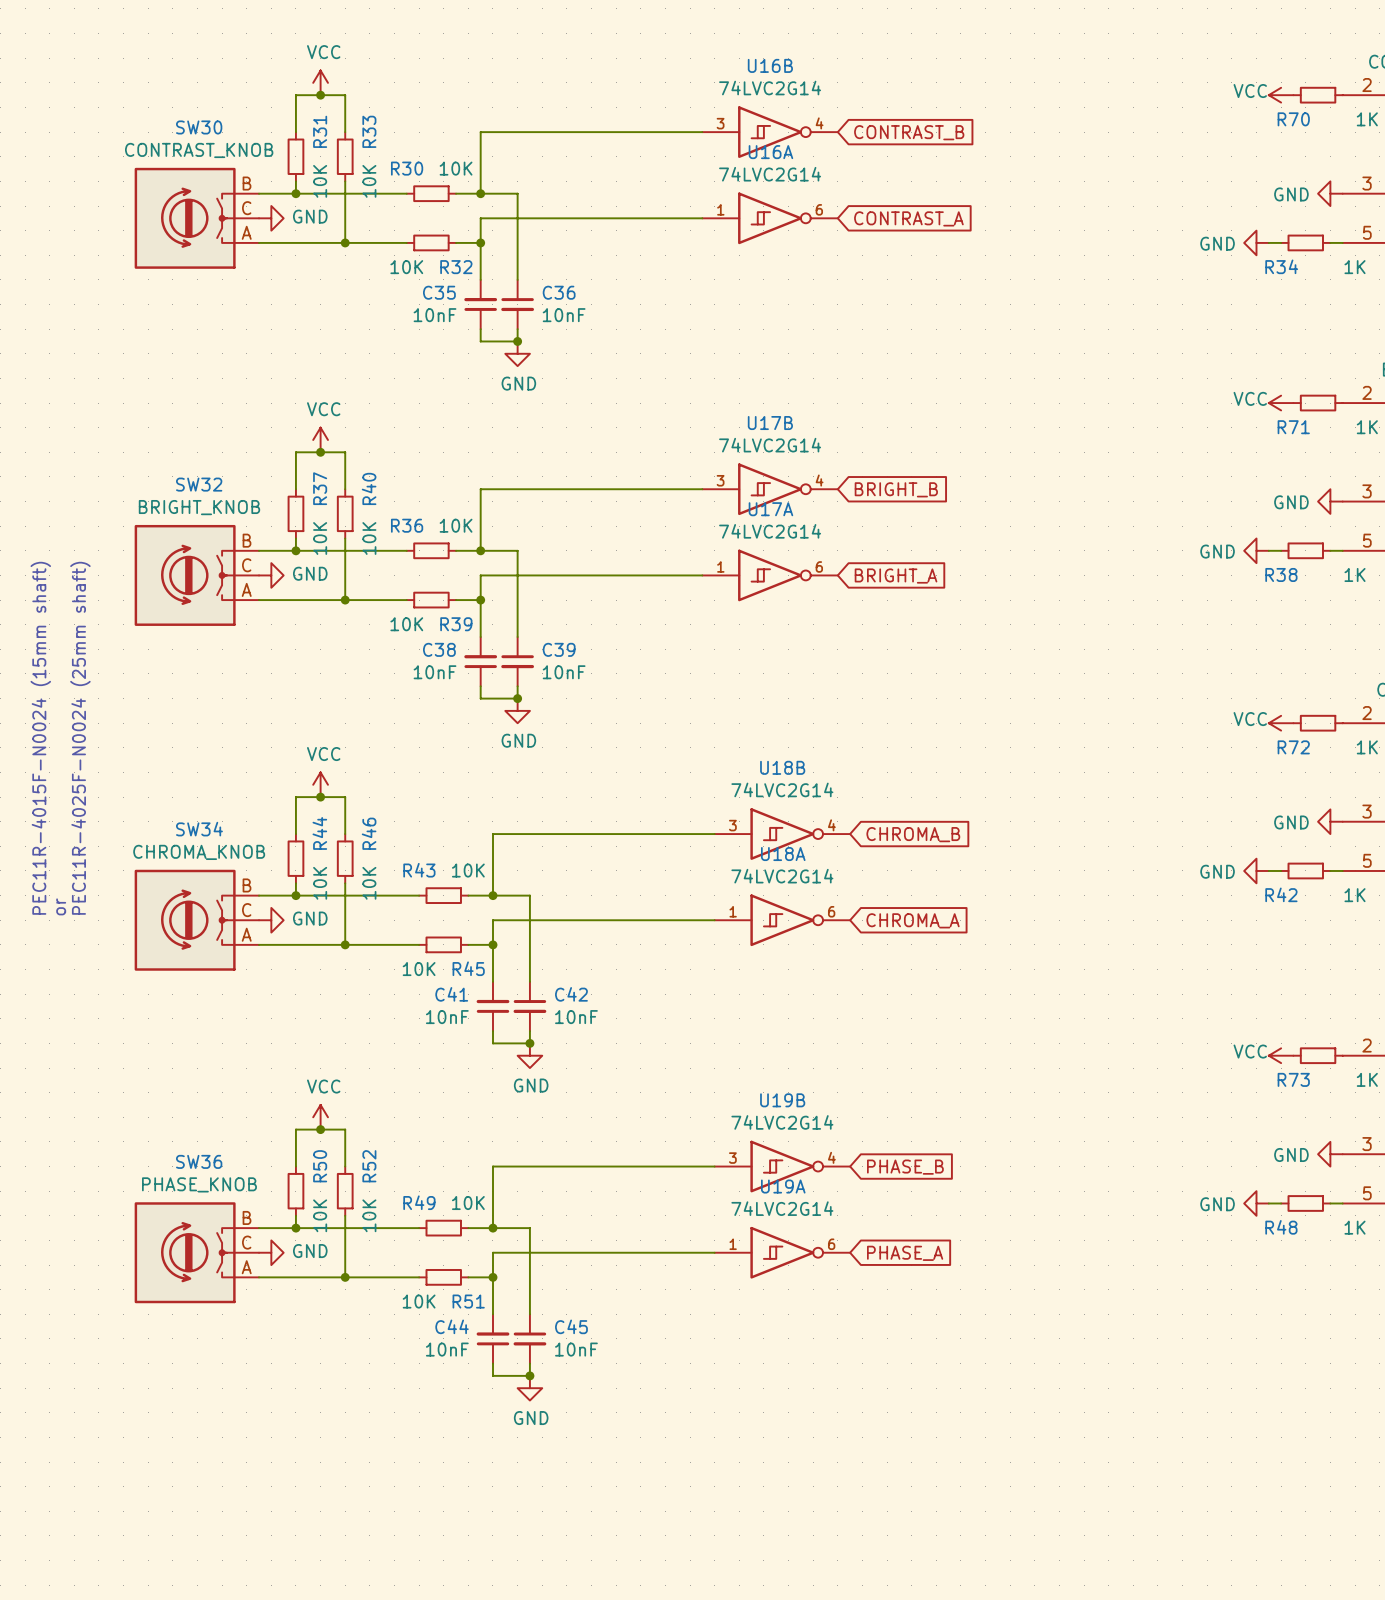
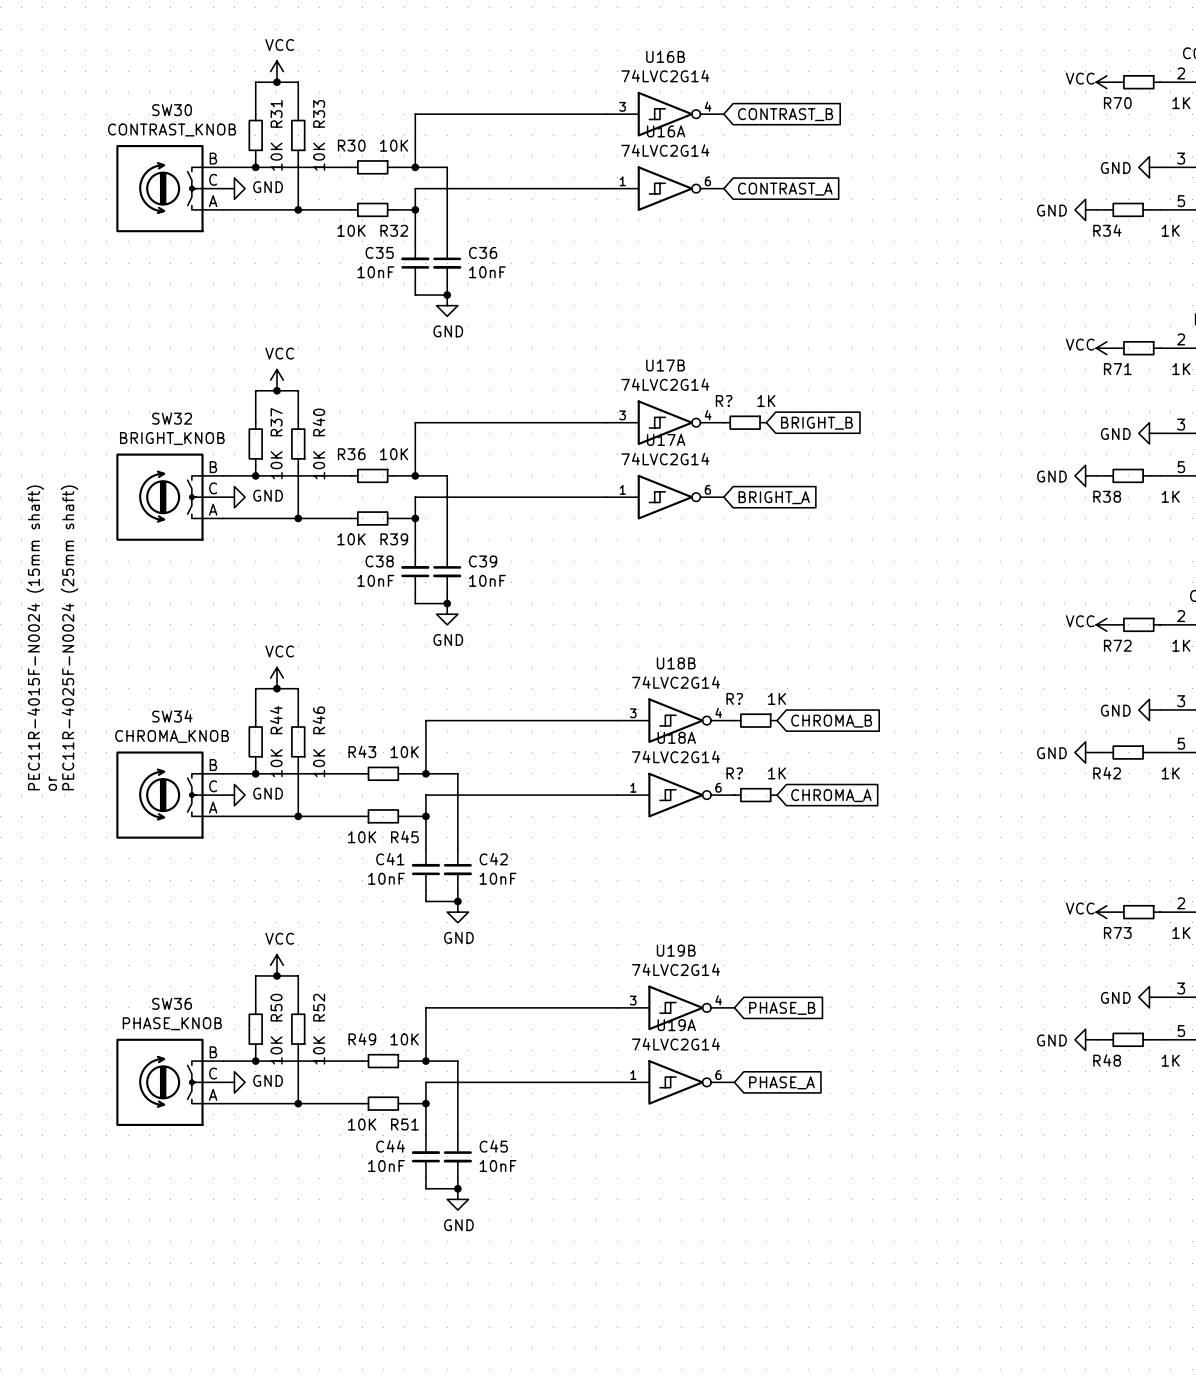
R?: none -> 1K (745, 422)
global label position: BRIGHT_B (896, 489) -> BRIGHT_B (816, 423)
R?: none -> 1K (755, 720)
global label position: CHROMA_B (913, 834) -> CHROMA_B (831, 721)
R?: none -> 1K (755, 795)
global label position: CHROMA_A (913, 920) -> CHROMA_A (831, 795)

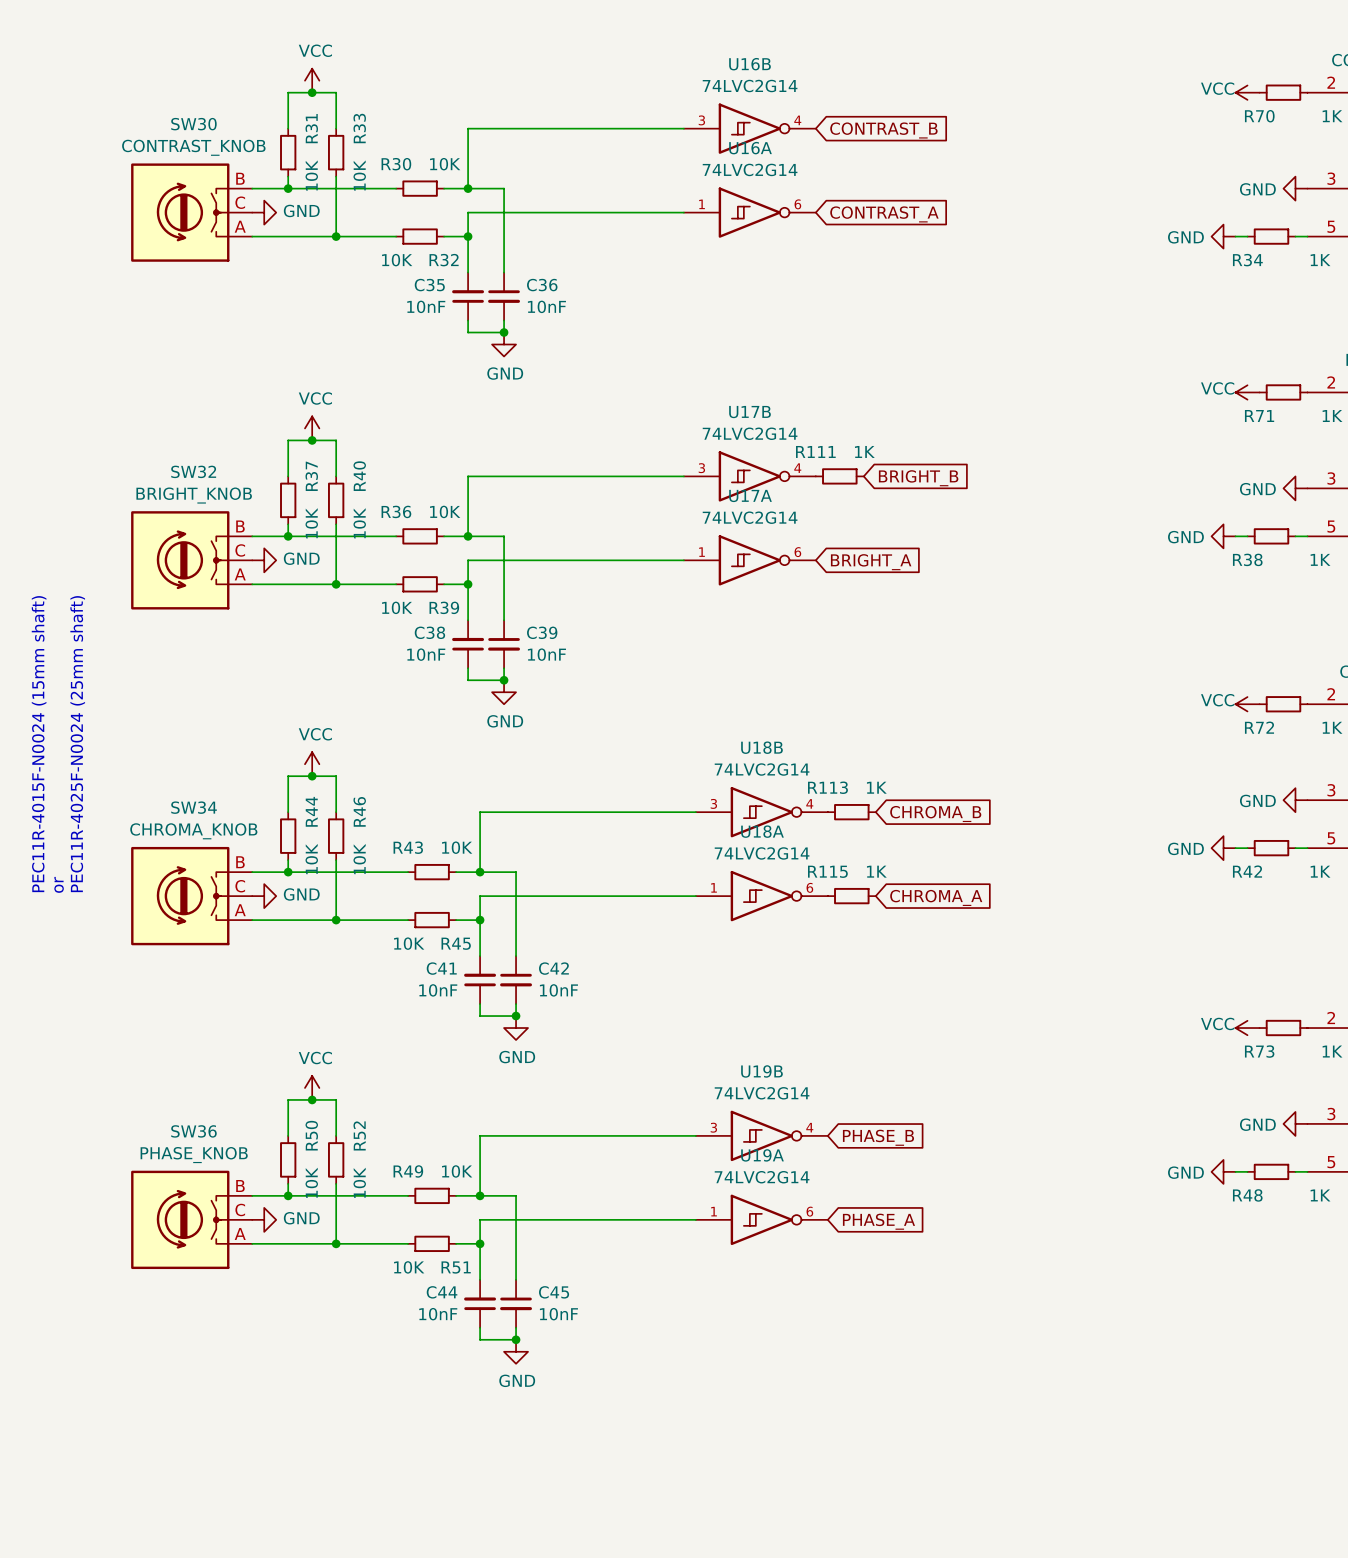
R? name: R? (724, 401) -> R111 (815, 451)
R? name: R? (734, 698) -> R113 (827, 787)
R? name: R? (734, 773) -> R115 (827, 871)

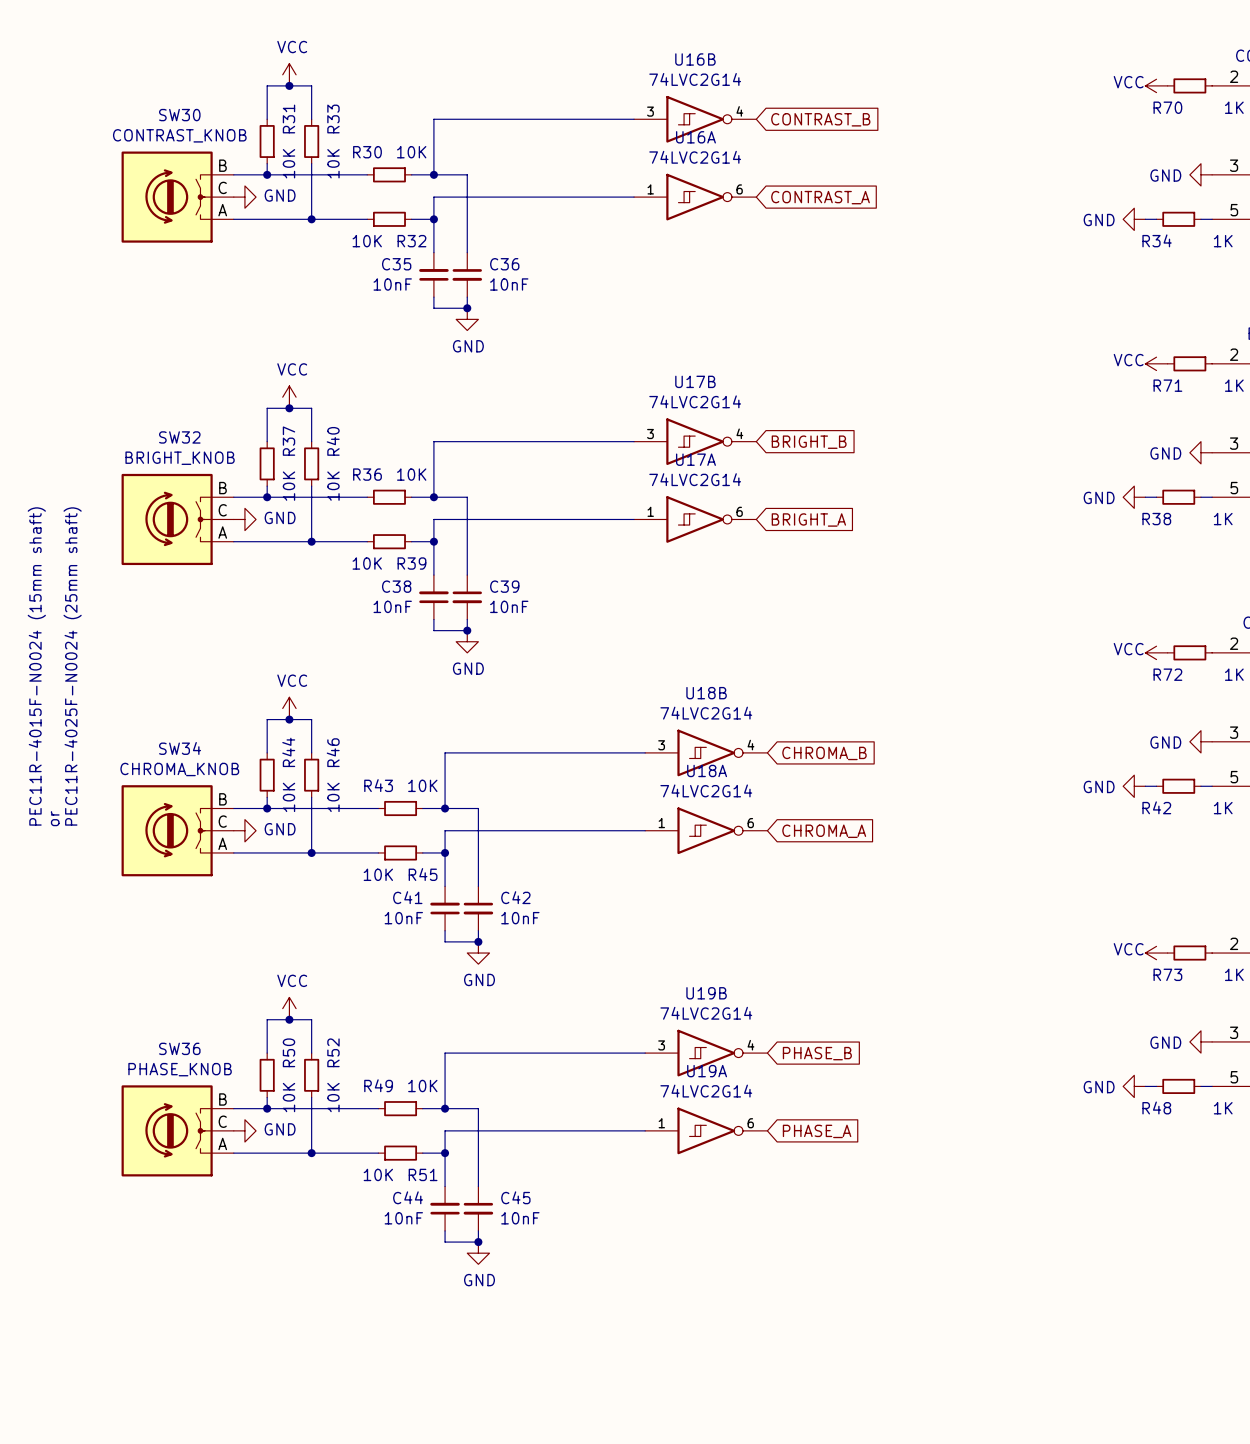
R111: 1K (839, 476) -> none
global label position: BRIGHT_B (918, 478) -> BRIGHT_B (809, 442)
R113: 1K (851, 812) -> none
global label position: CHROMA_B (935, 813) -> CHROMA_B (824, 753)
R115: 1K (851, 896) -> none
global label position: CHROMA_A (936, 897) -> CHROMA_A (824, 831)

